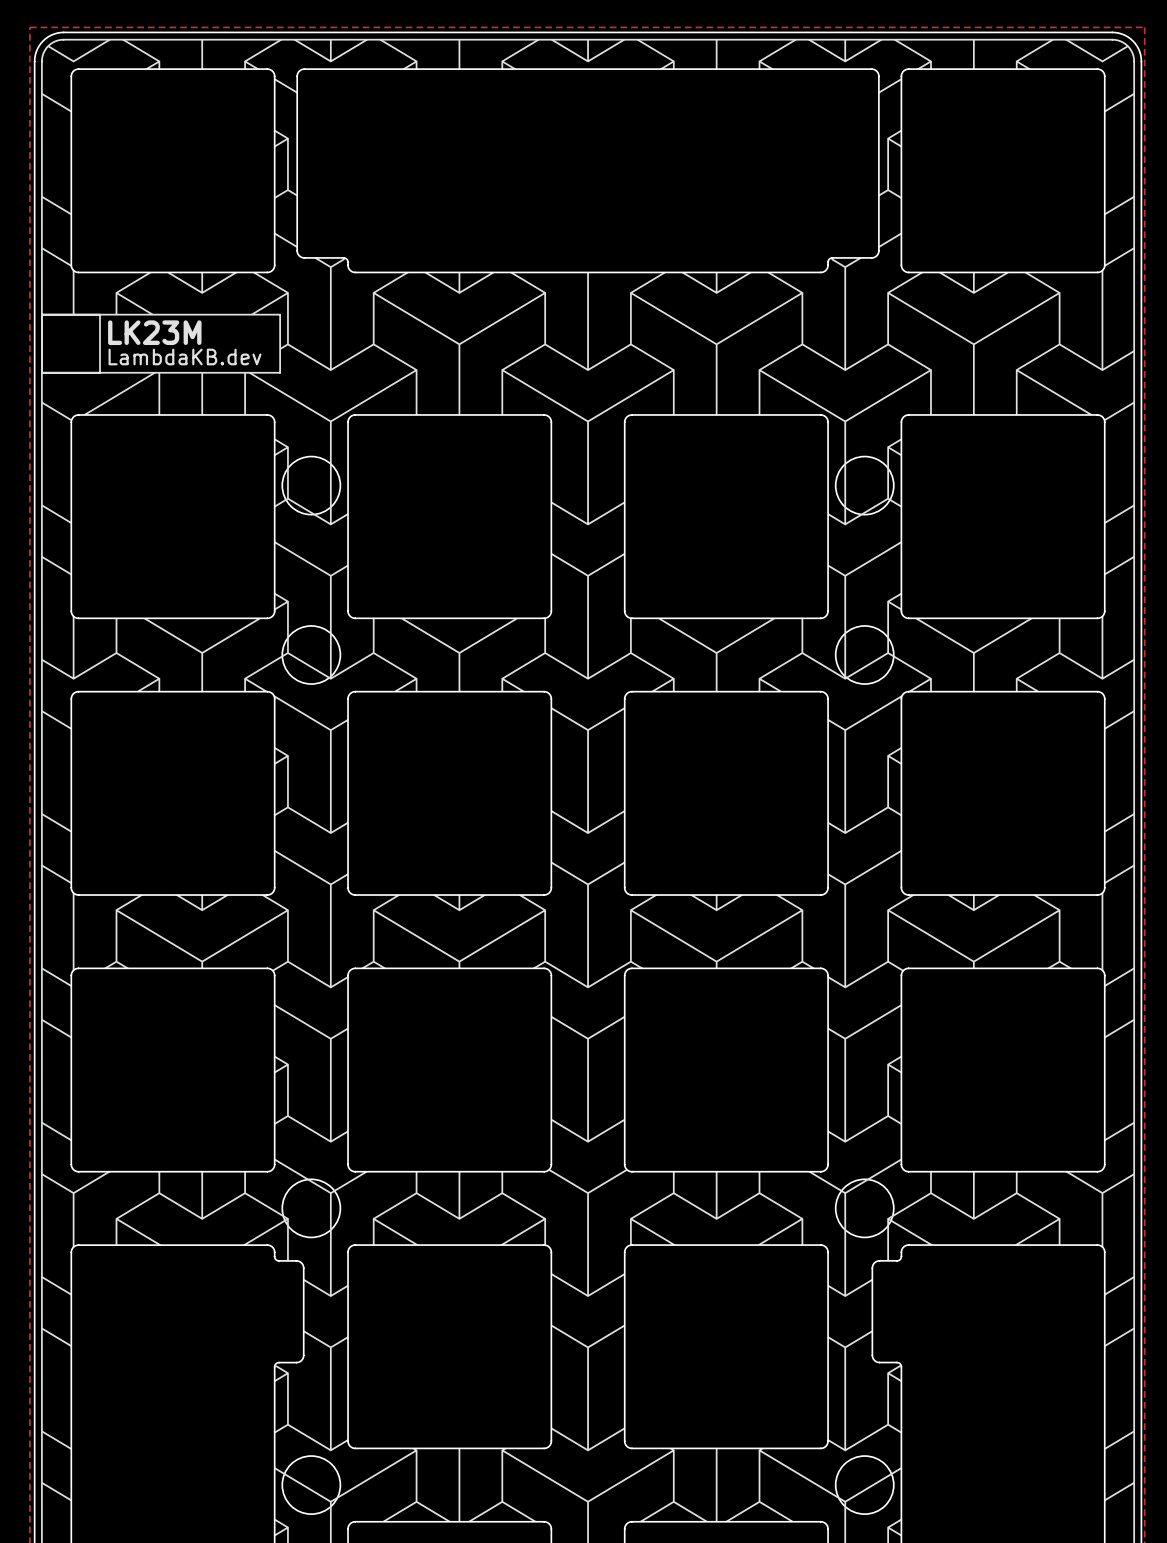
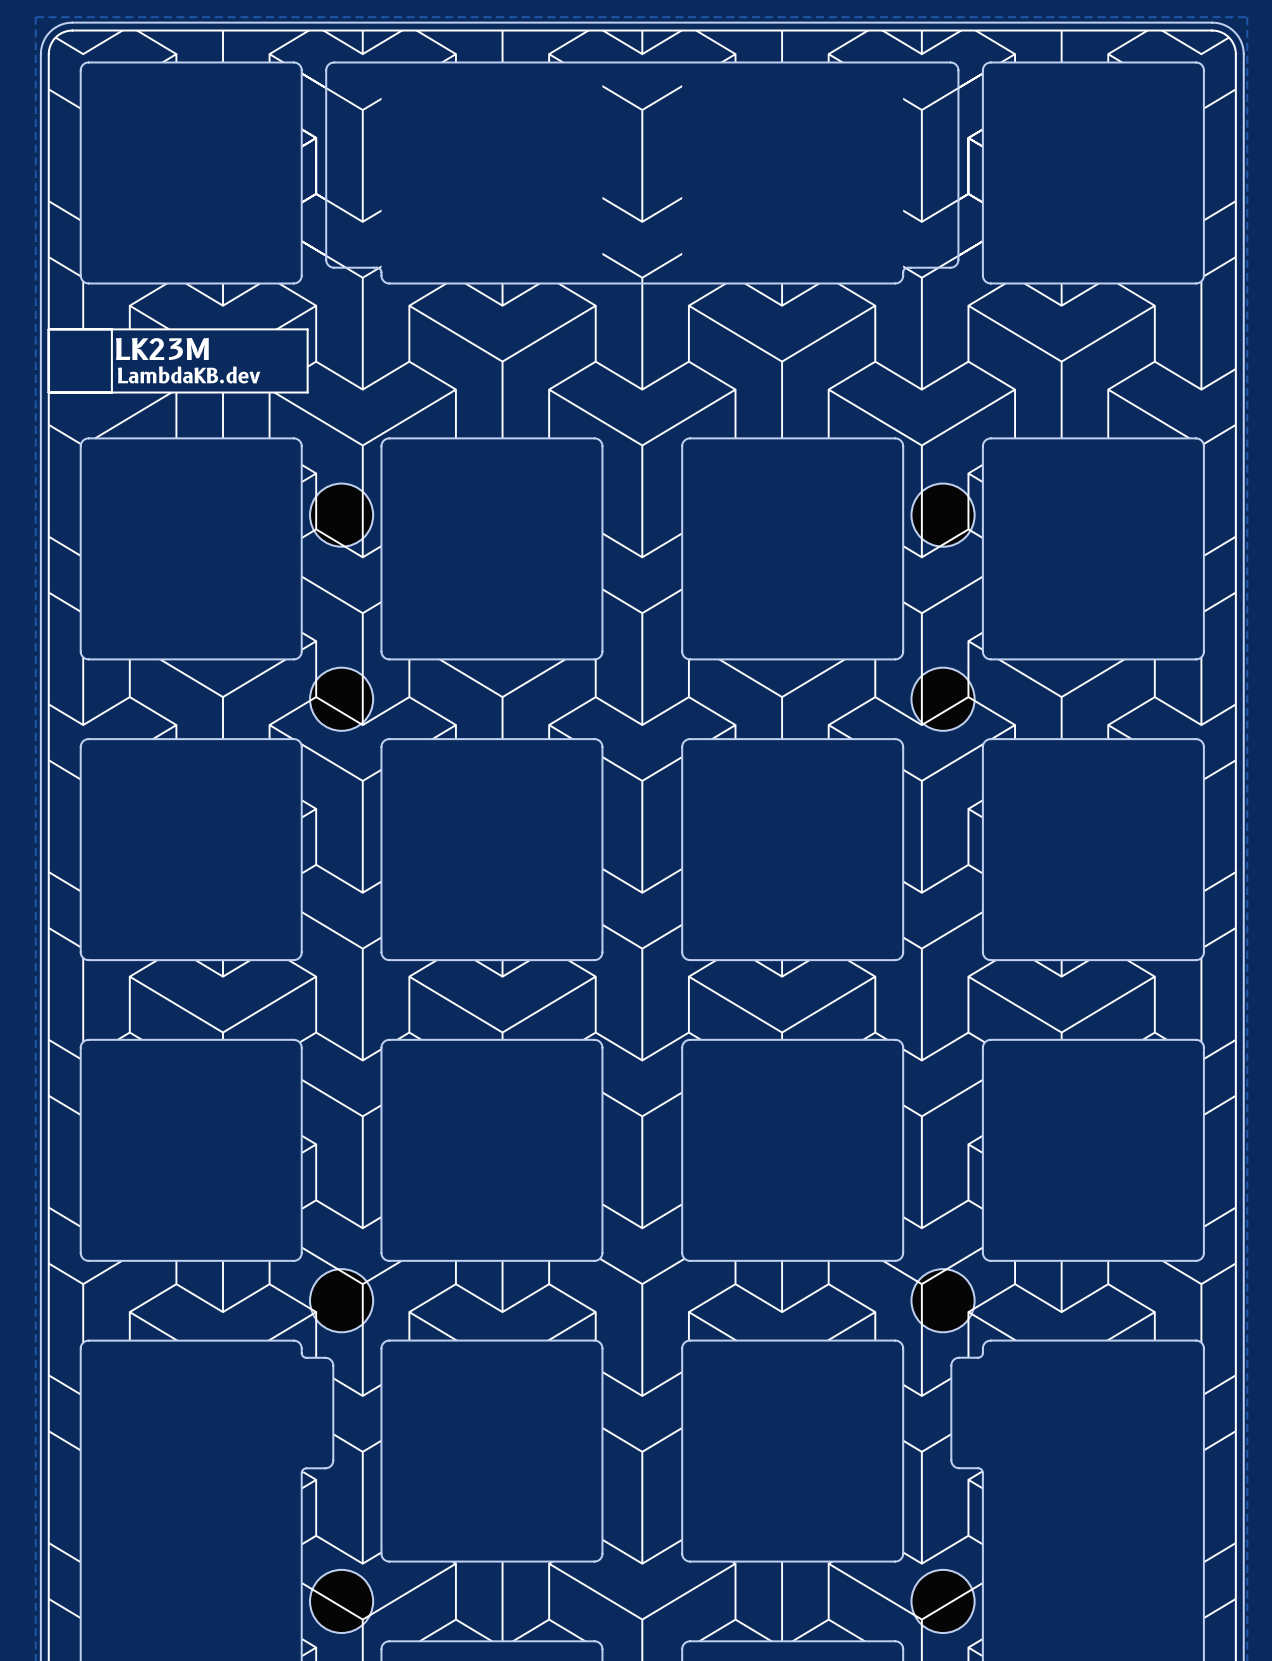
drawing: none -> [301, 72, 382, 223]
drawing: none -> [903, 72, 983, 223]
drawing: none -> [602, 85, 683, 223]
drawing shape: [247, 257, 1135, 526] -> [272, 240, 1236, 559]

